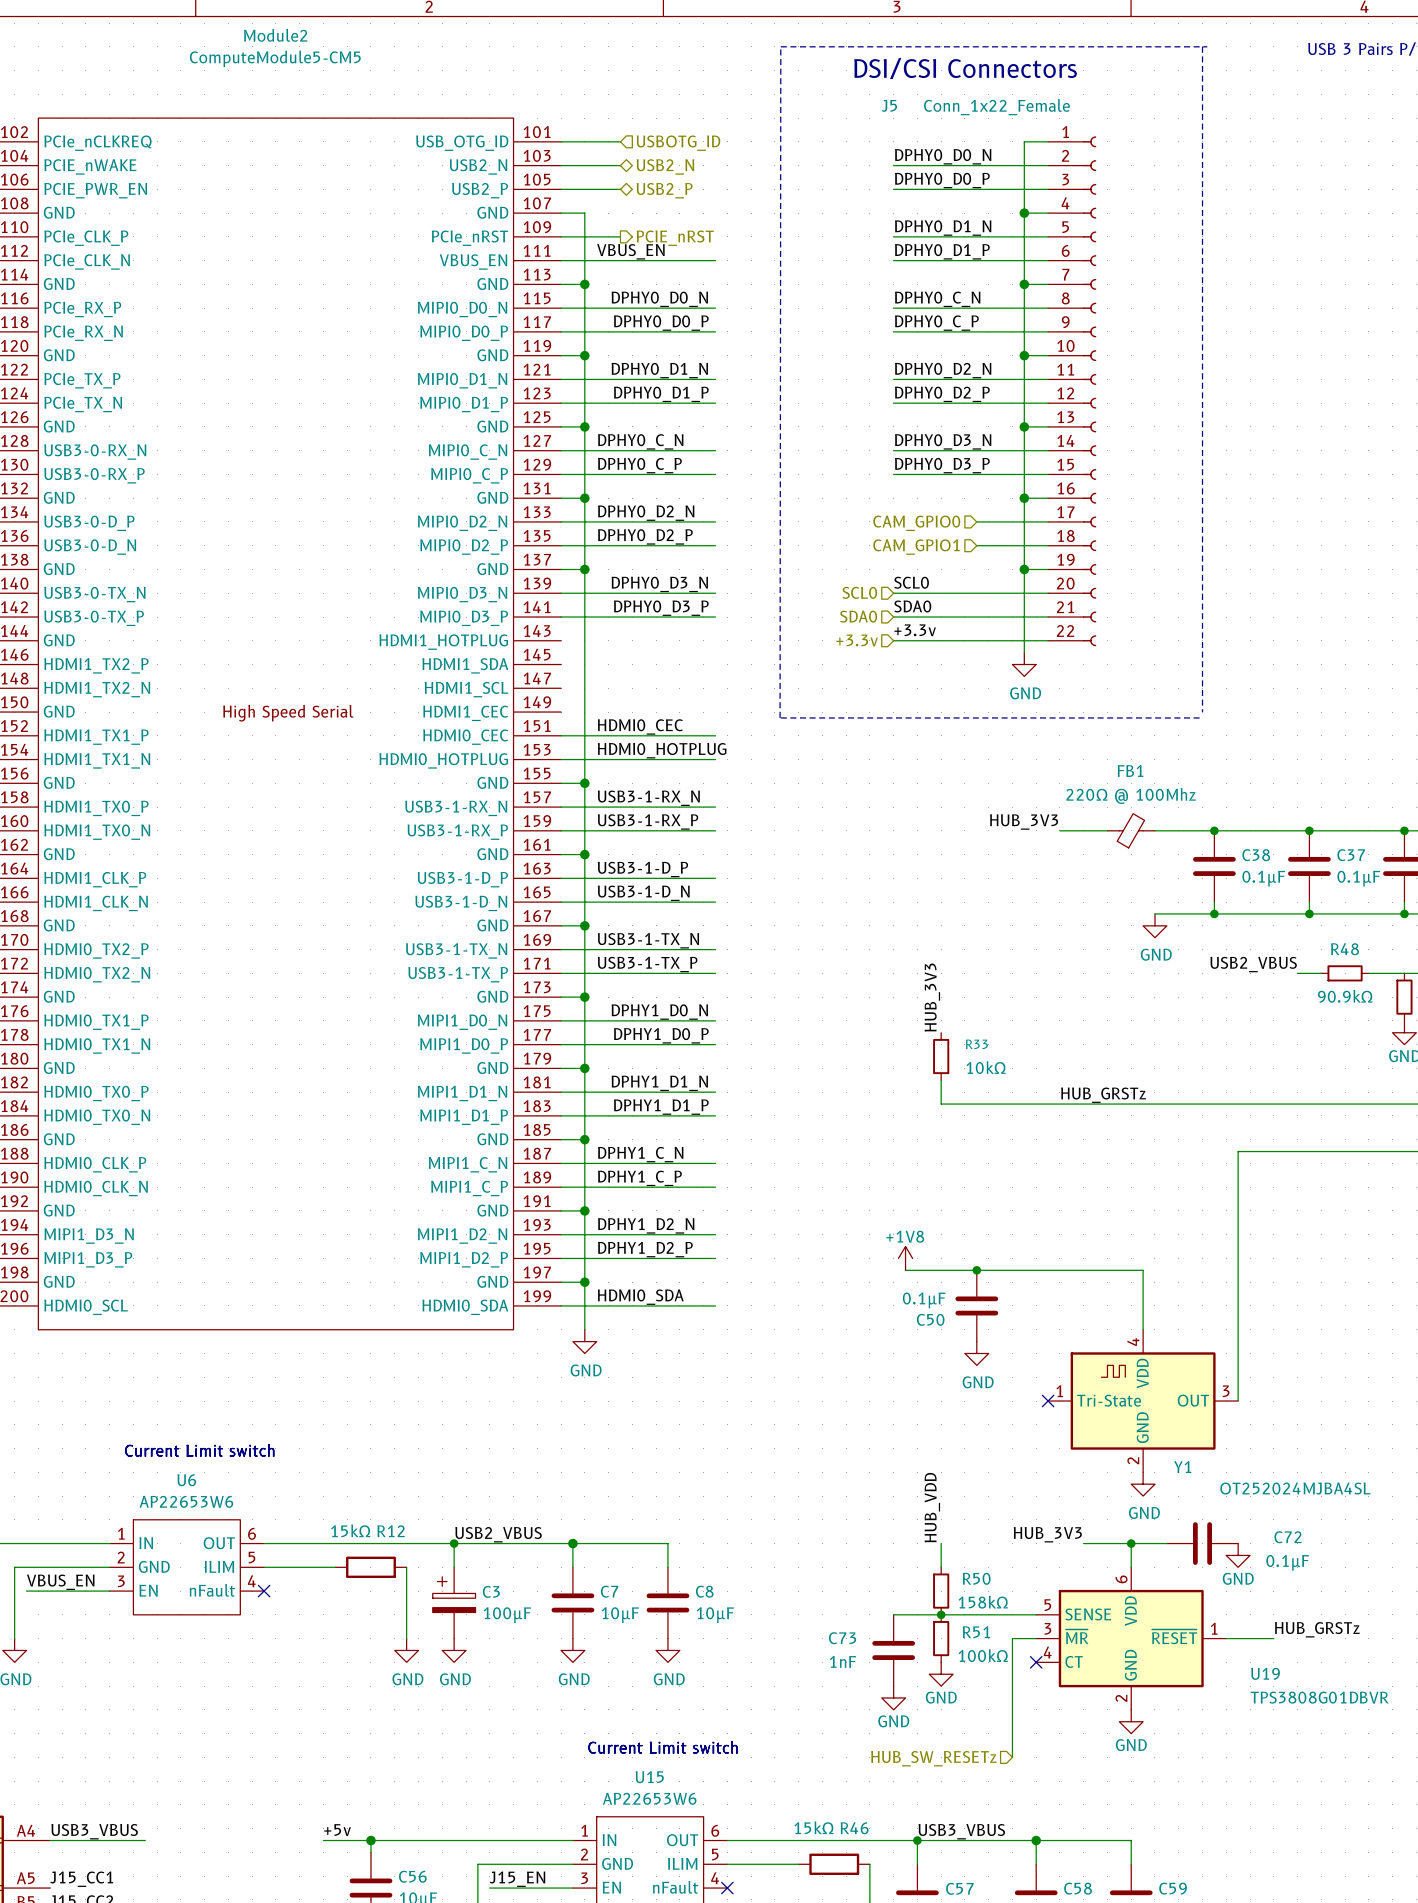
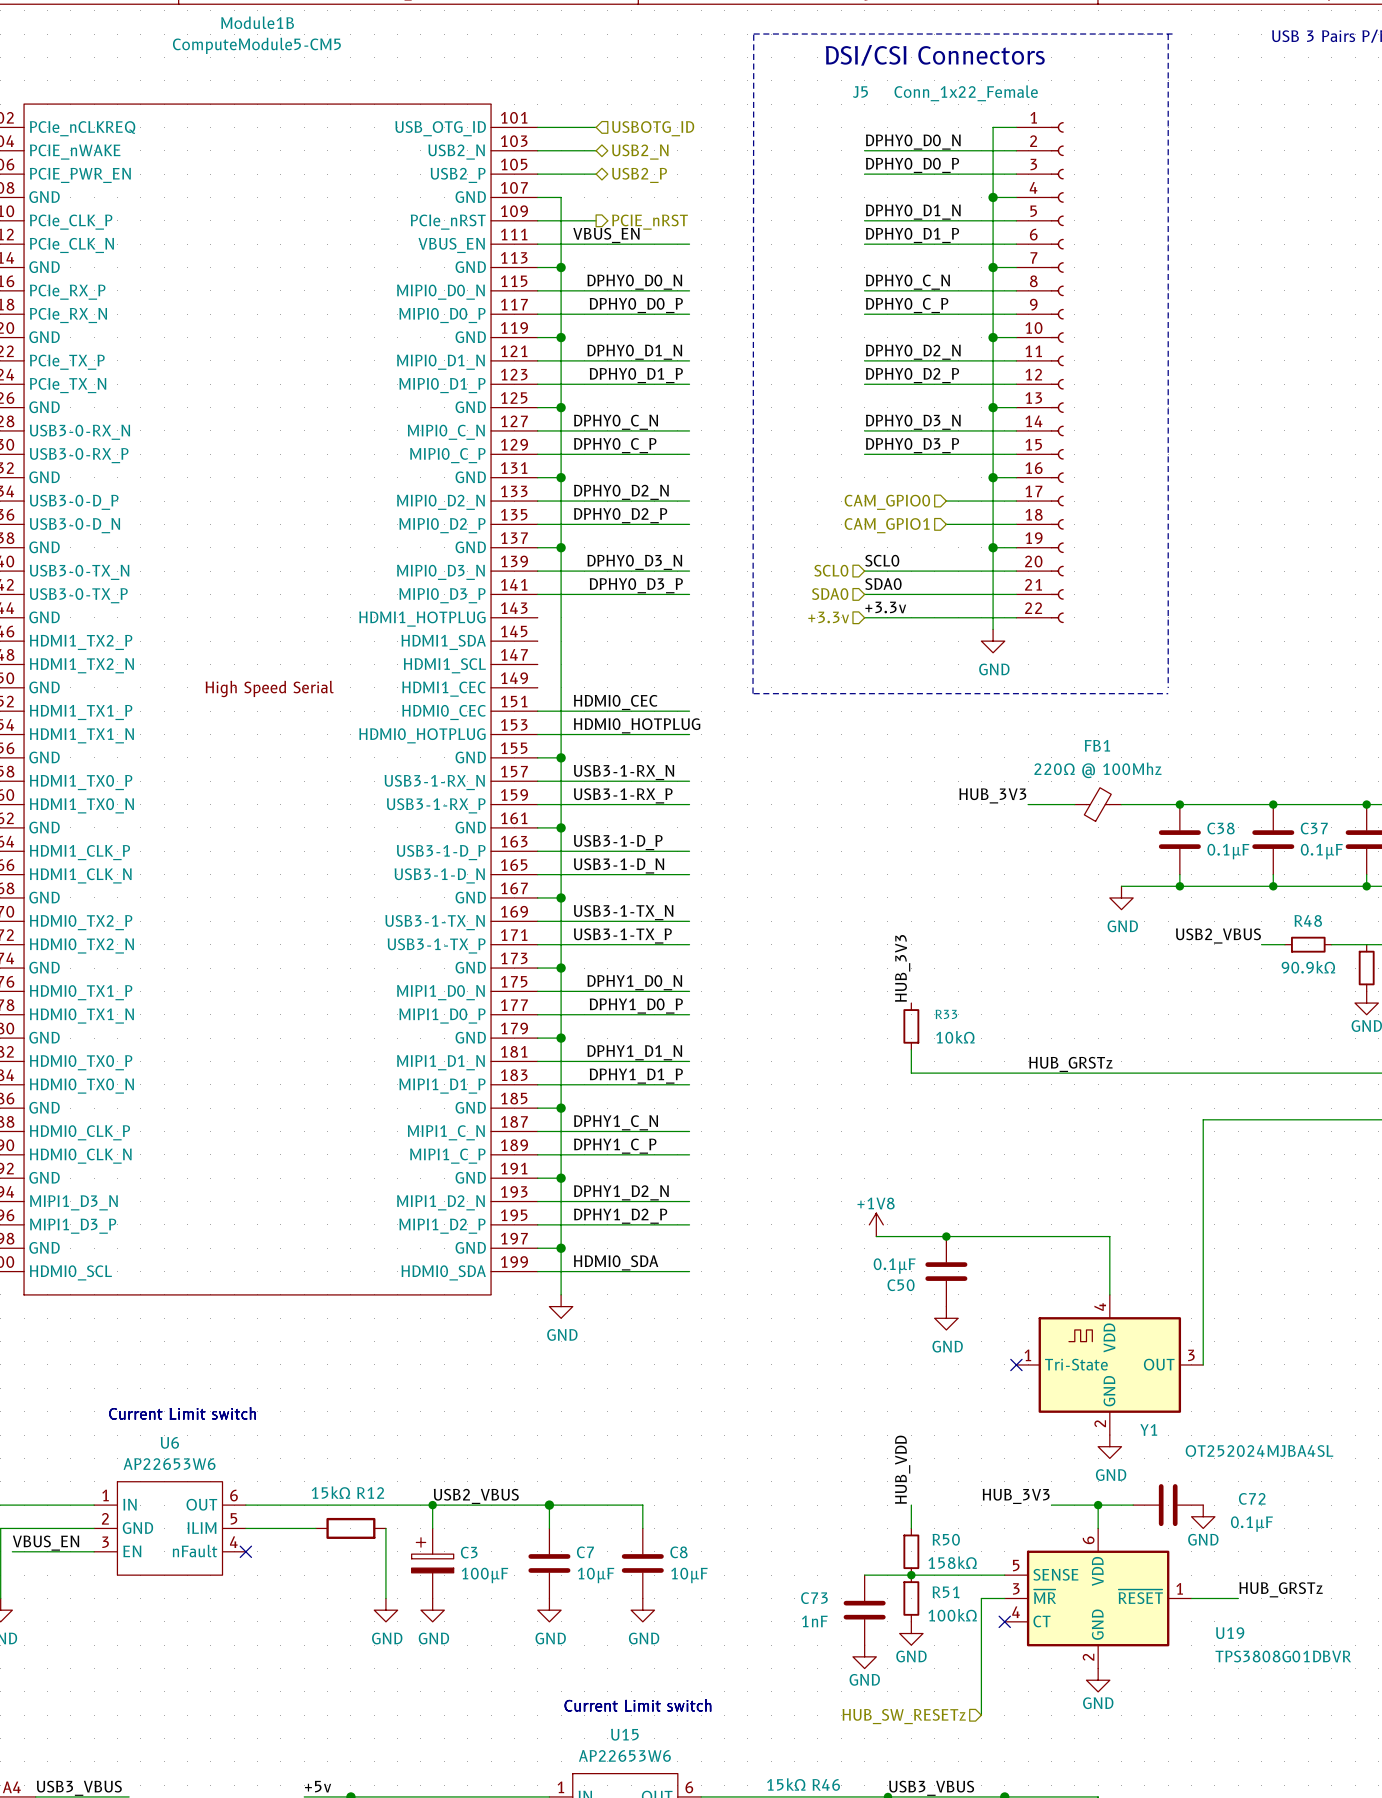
Module2 name: Module2 (275, 35) -> Module1B (257, 22)

